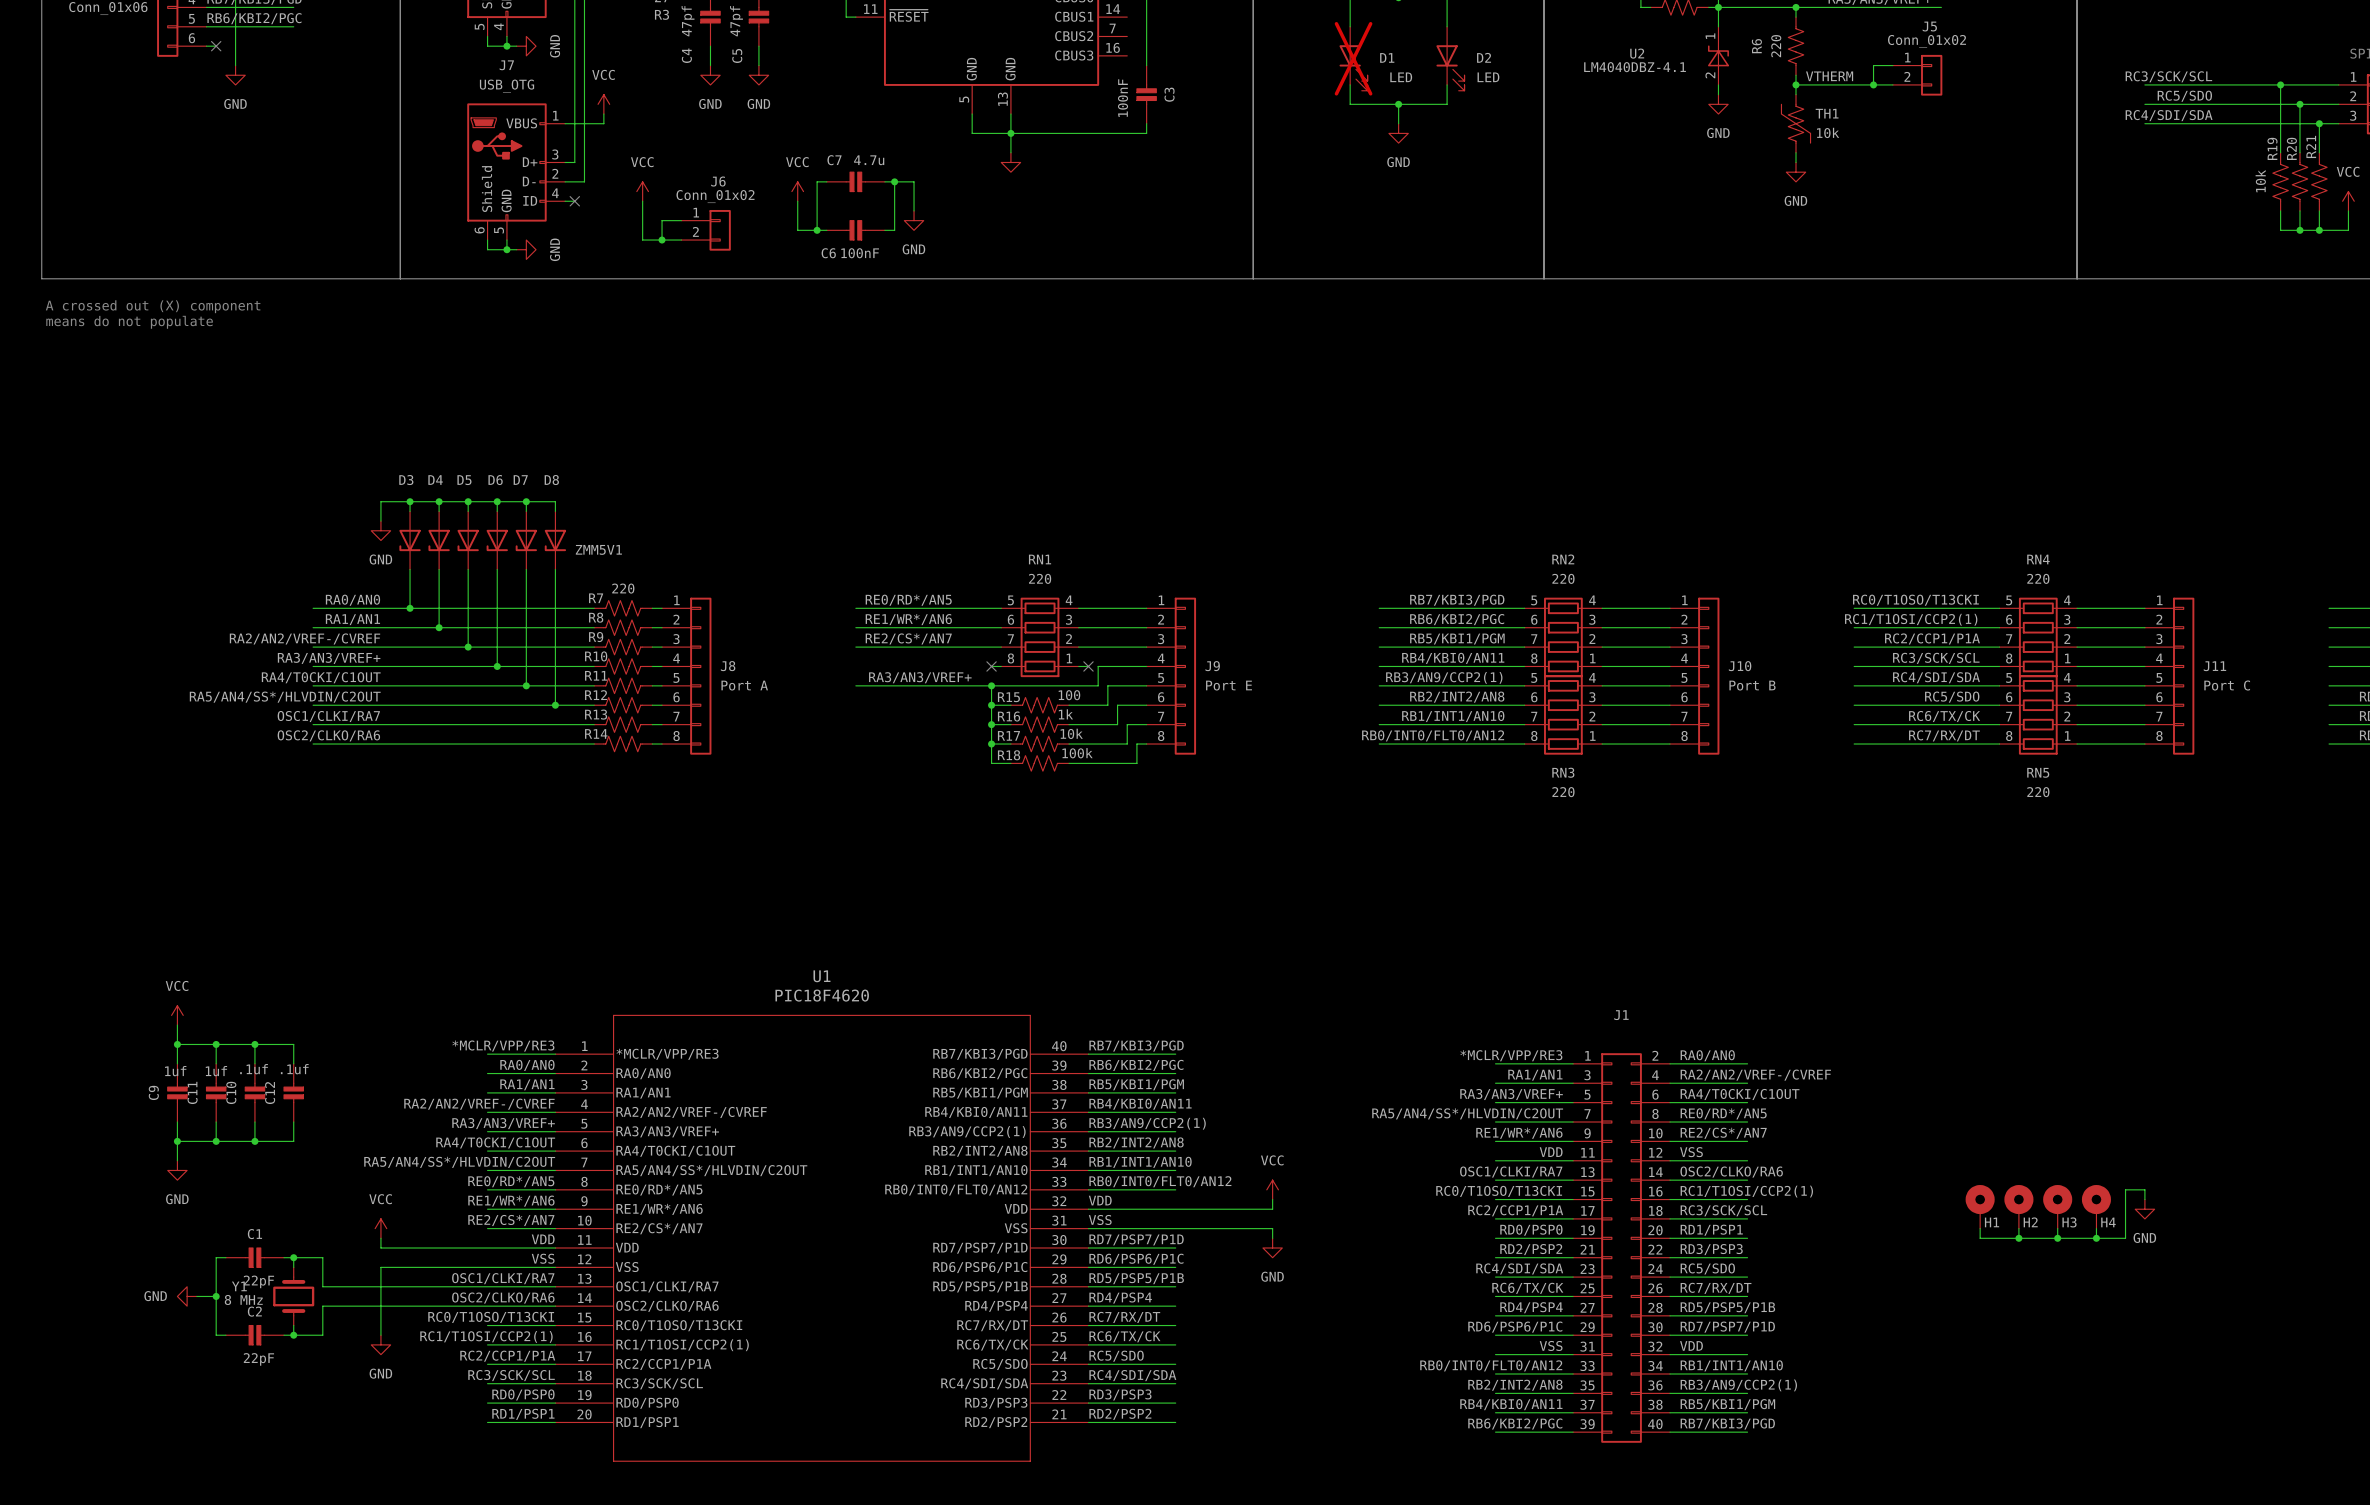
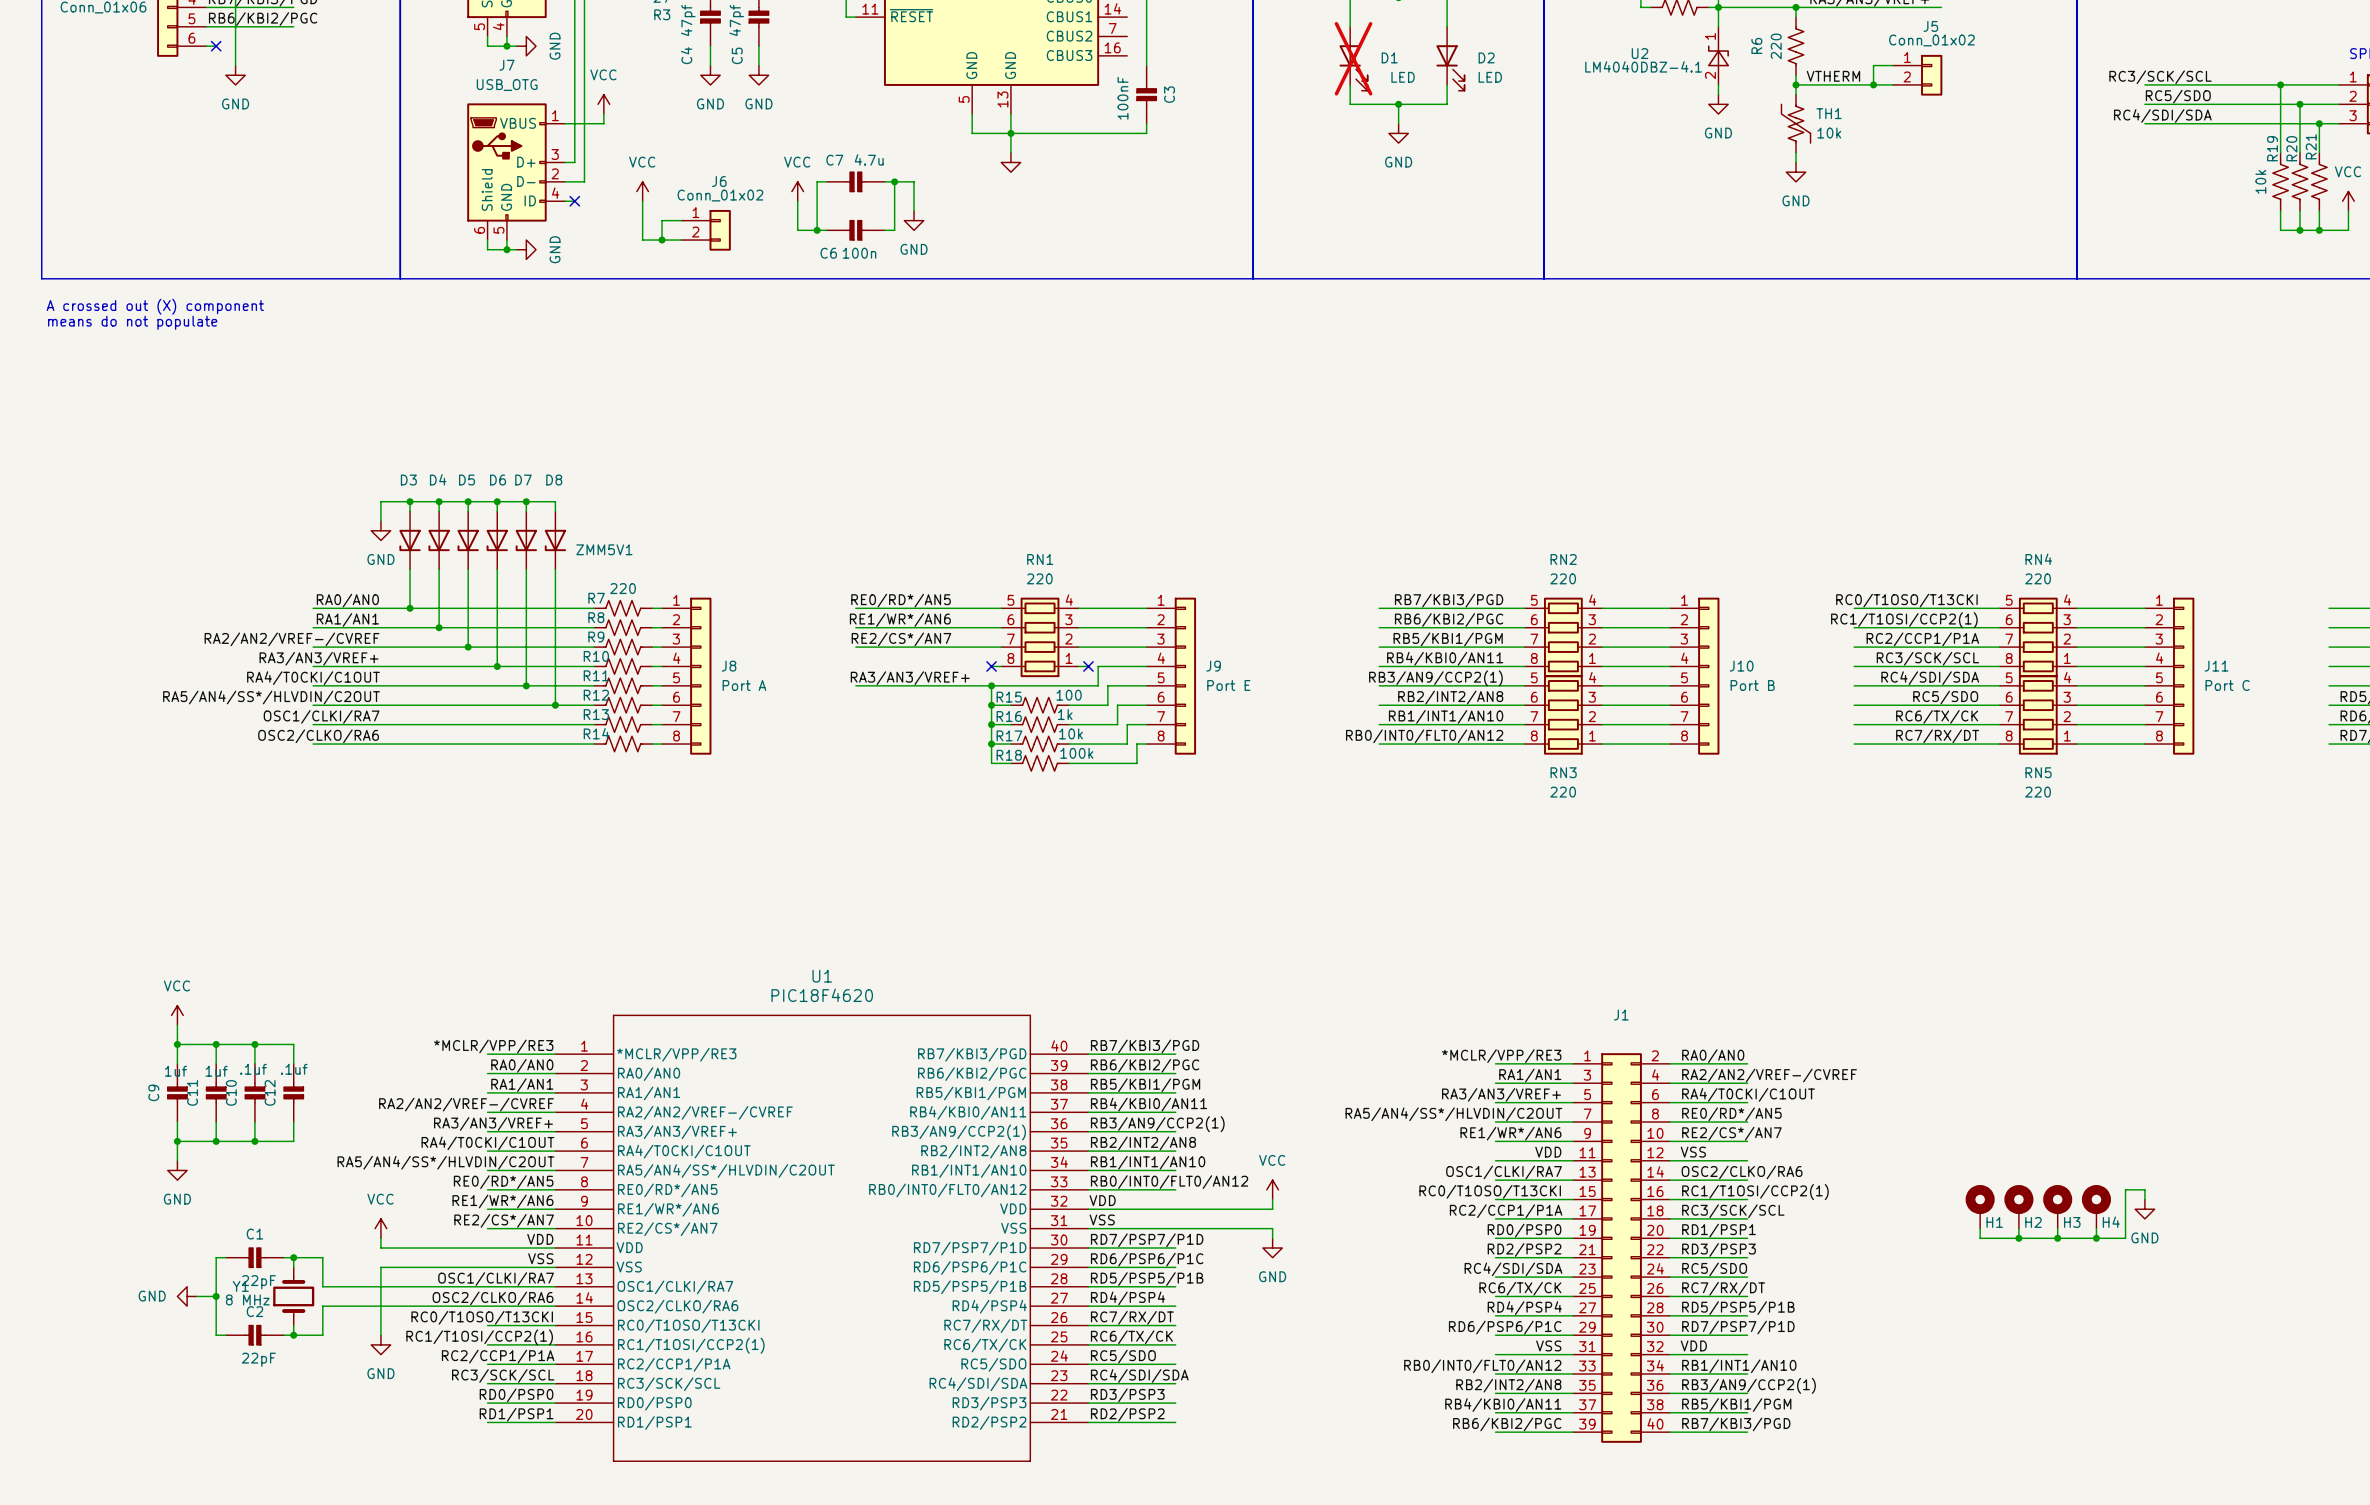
C6 value: 100nF (860, 253) -> 100n (859, 253)

